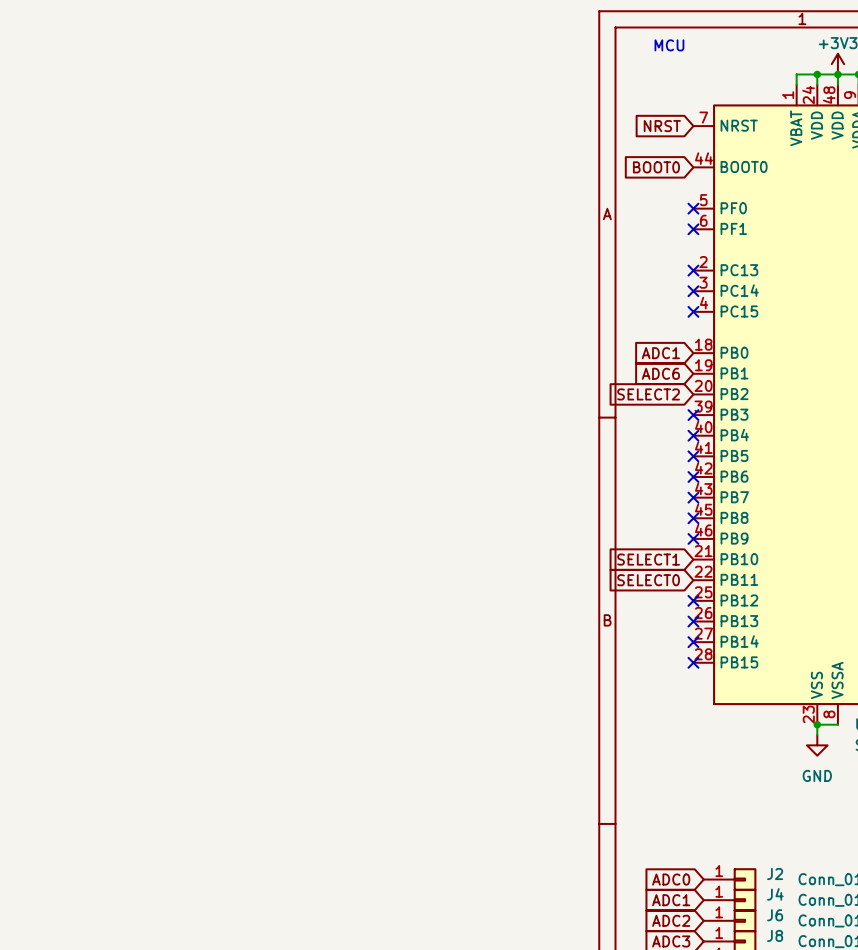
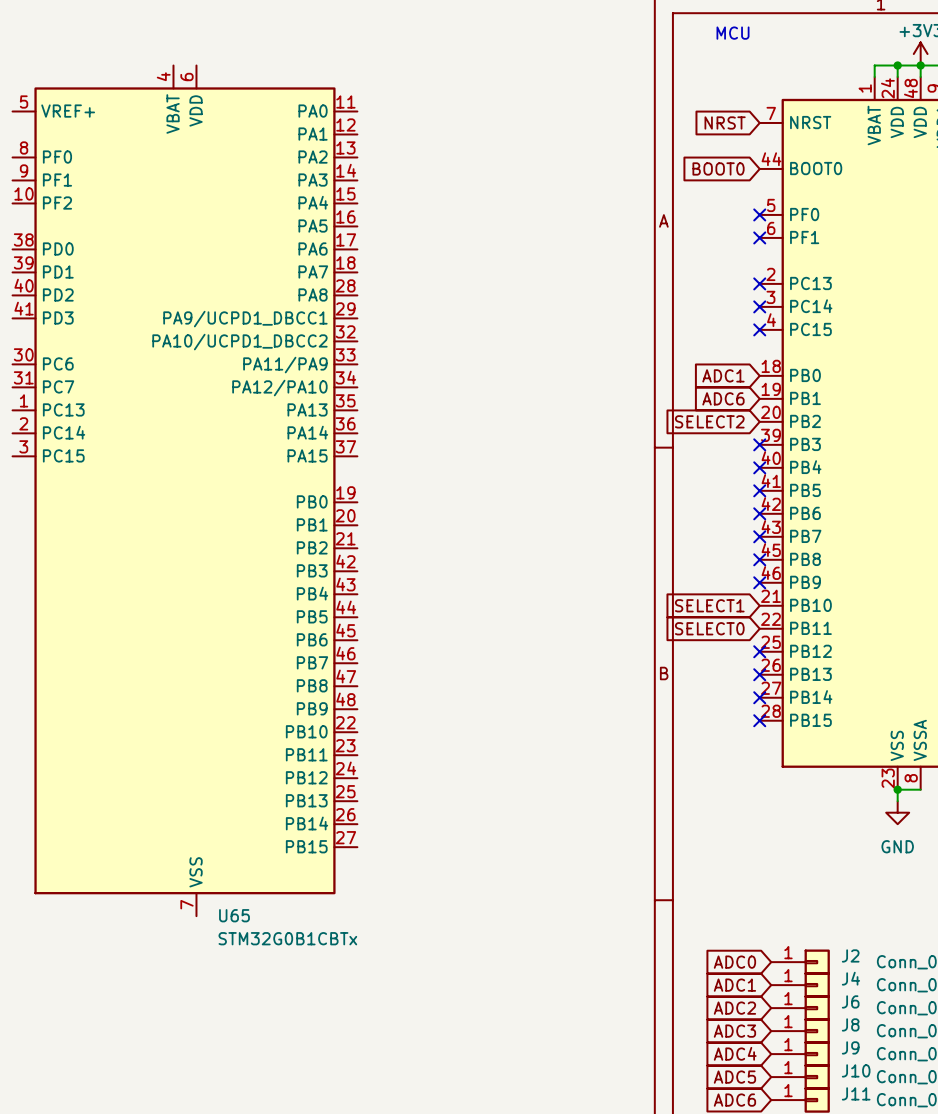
U65: none -> STM32G0B1CBTx (184, 490)

